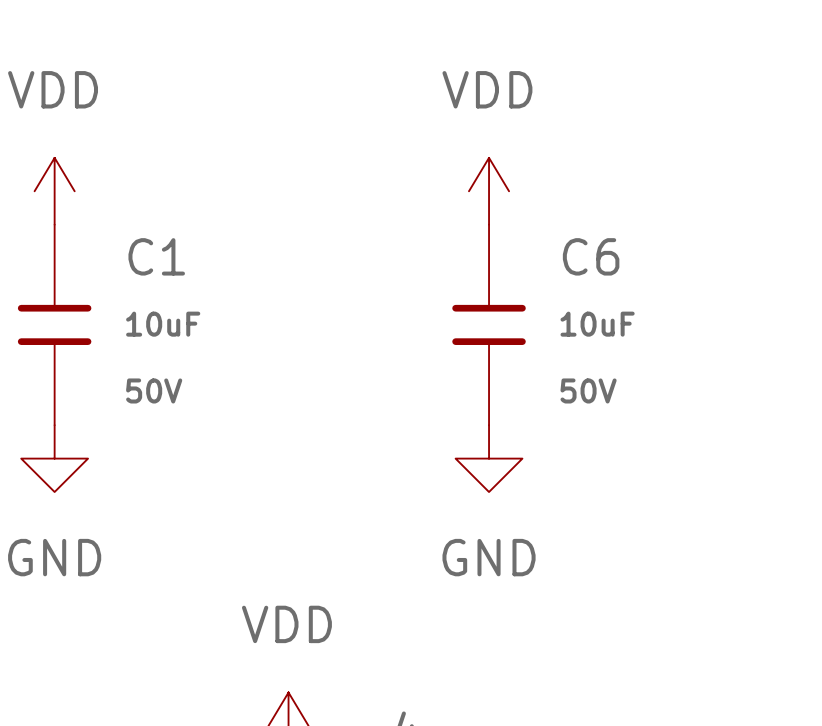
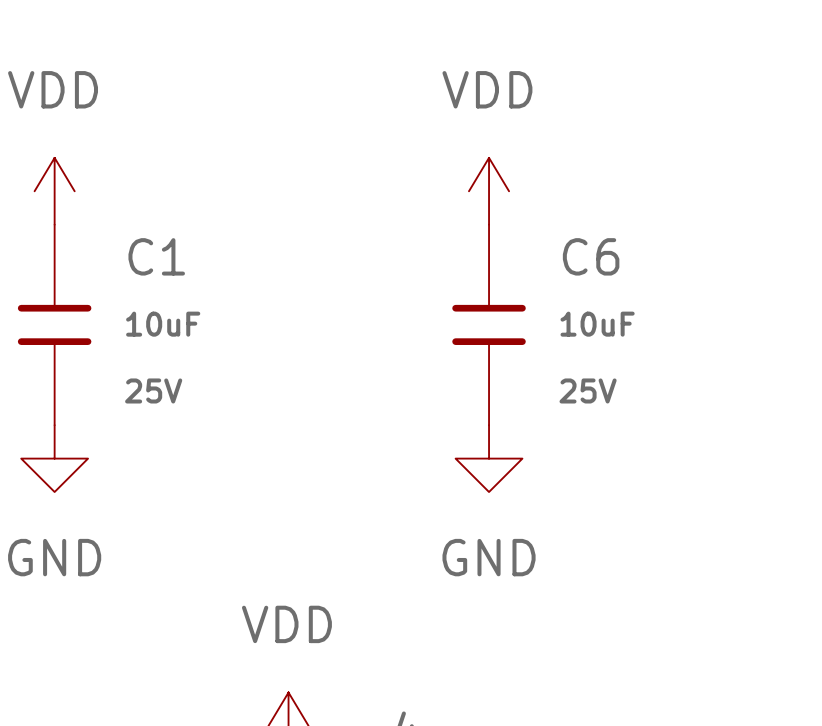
C1 text: 50V (154, 390) -> 25V (153, 390)
C6 text: 50V (588, 390) -> 25V (588, 390)

